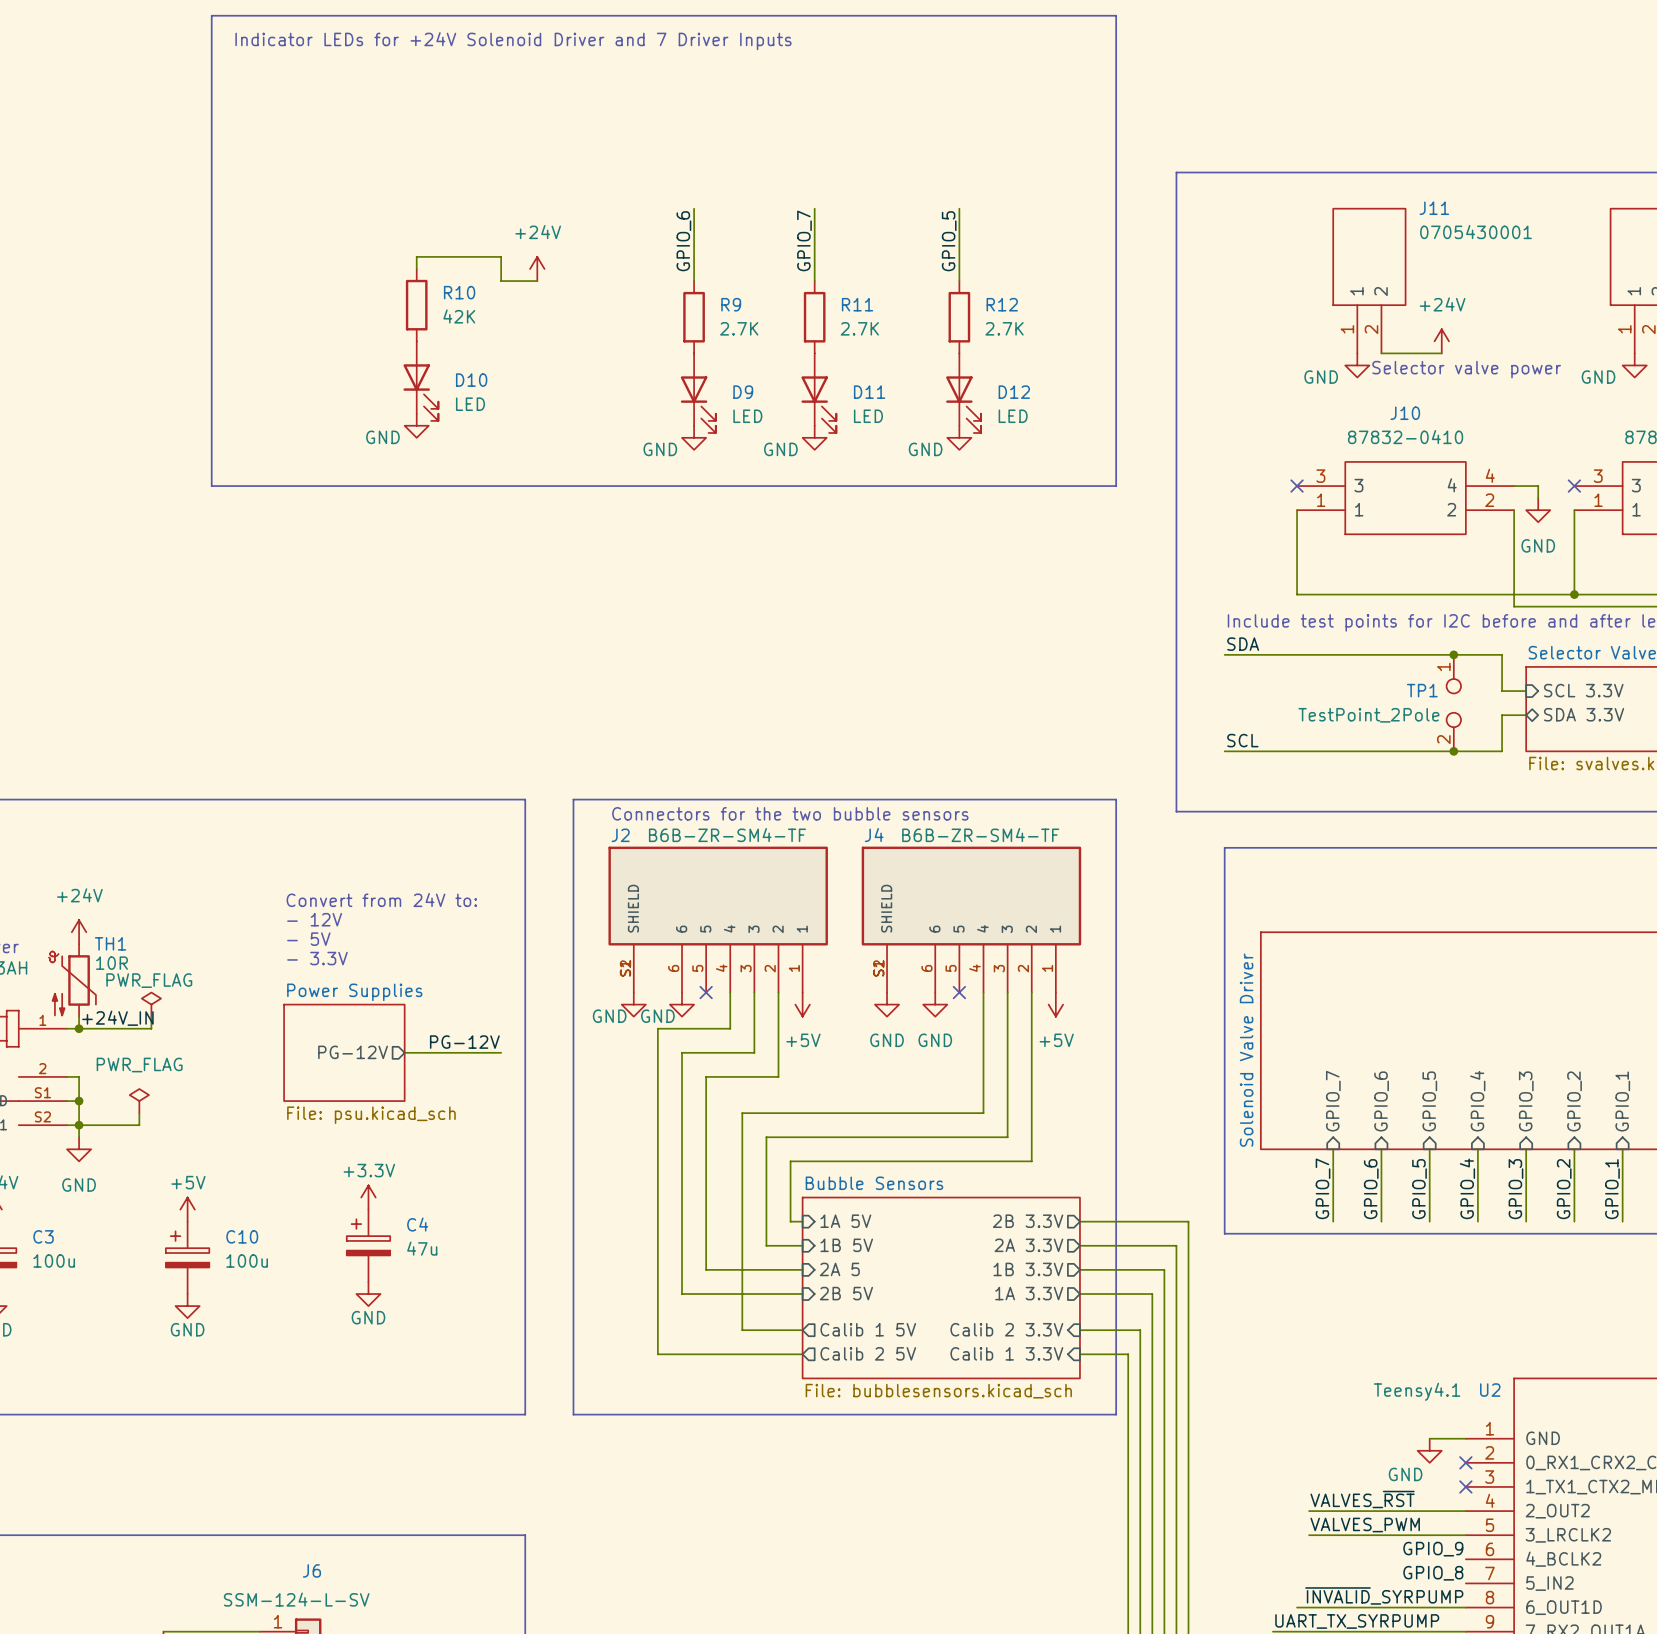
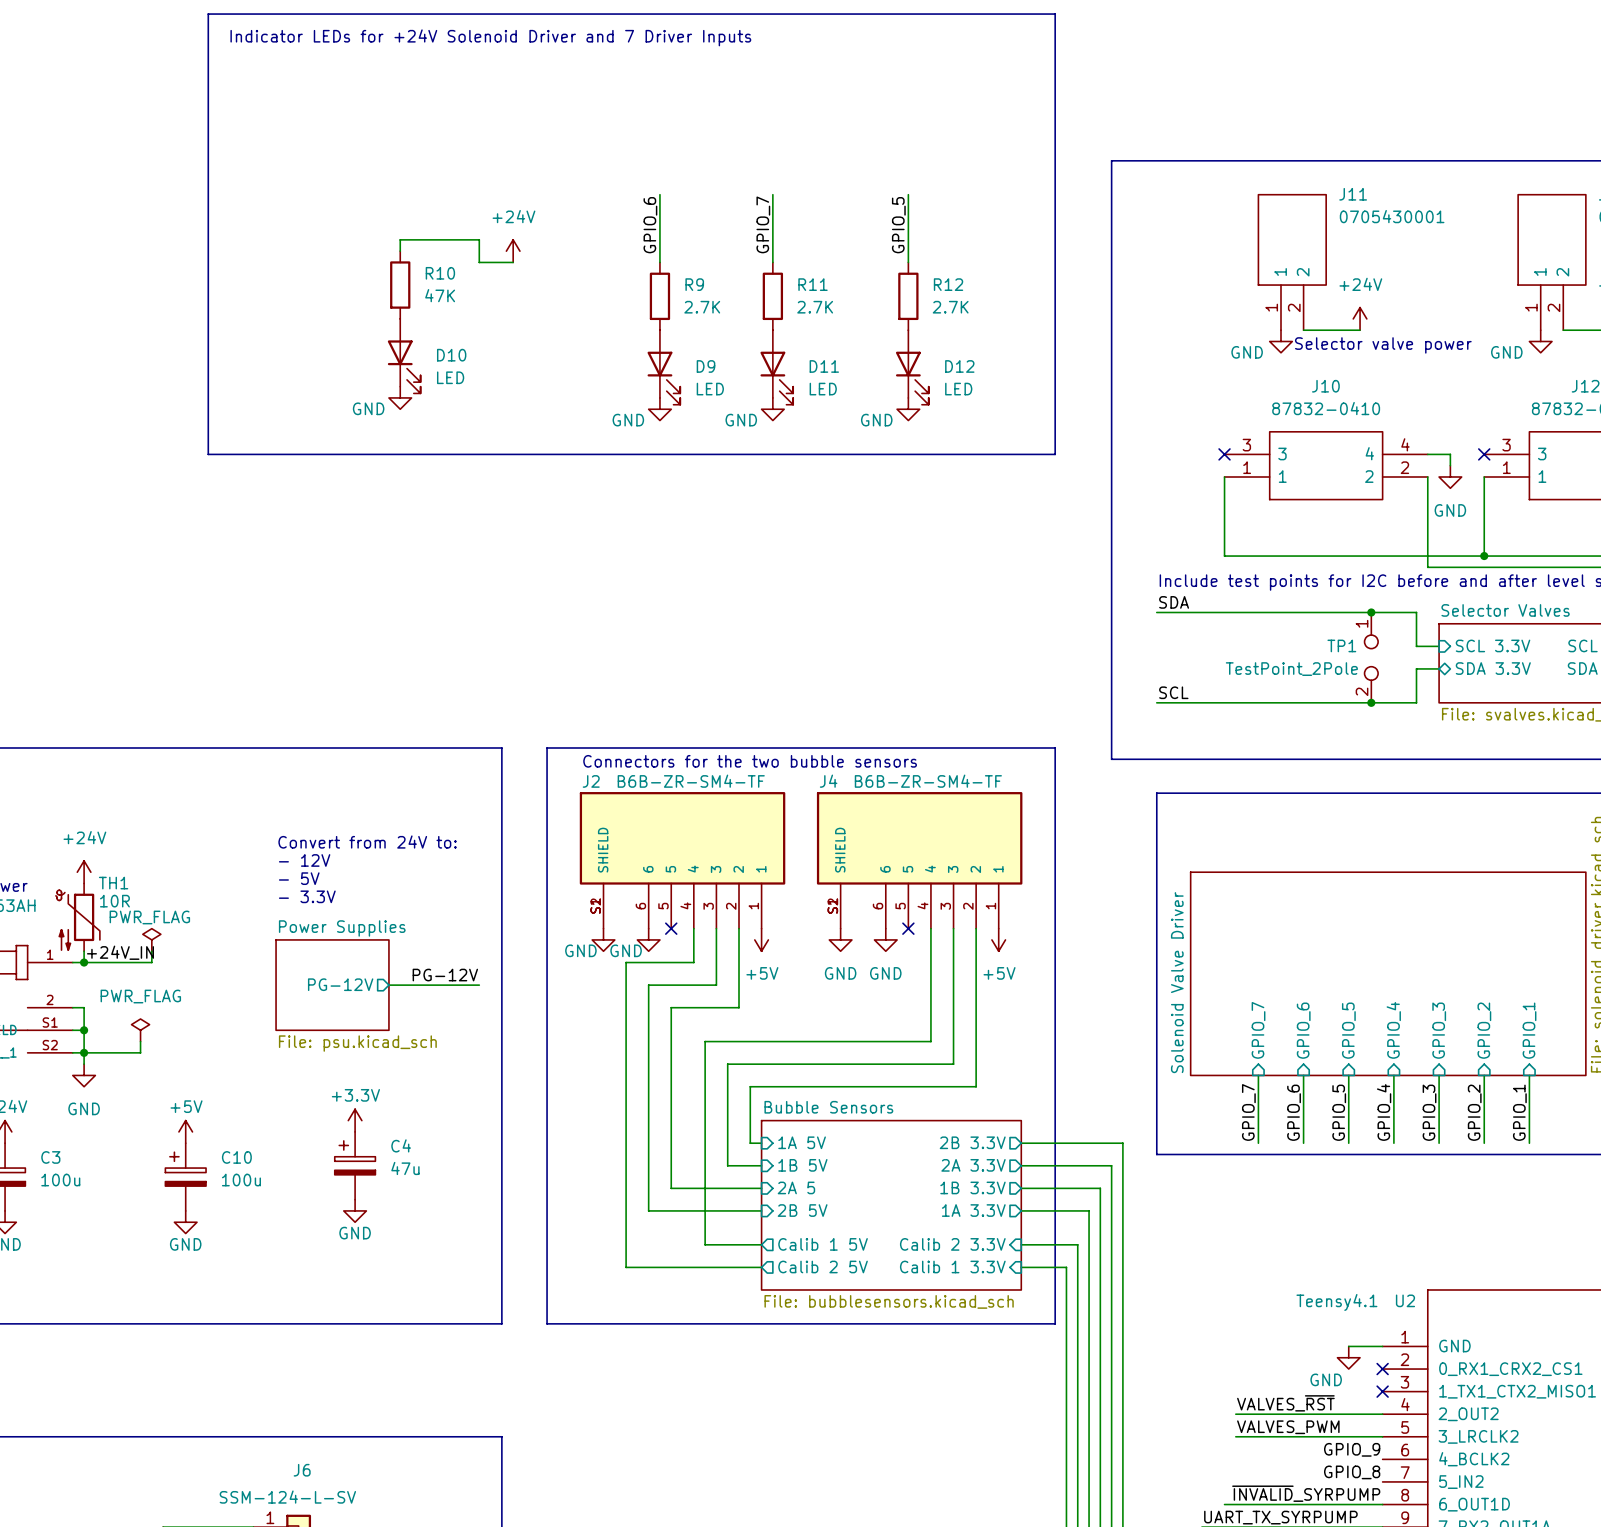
R10 value: 42K (459, 316) -> 47K (440, 295)

